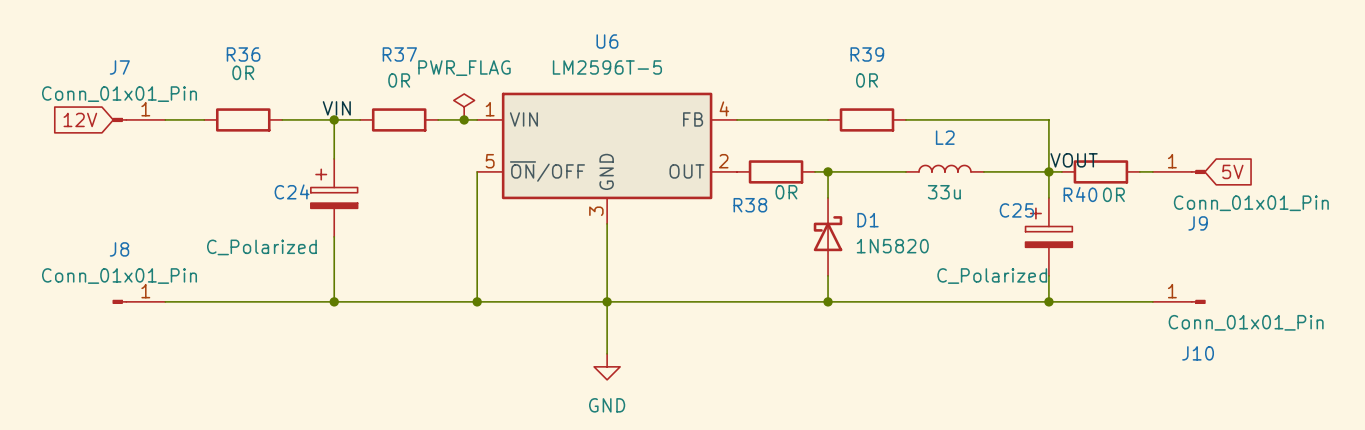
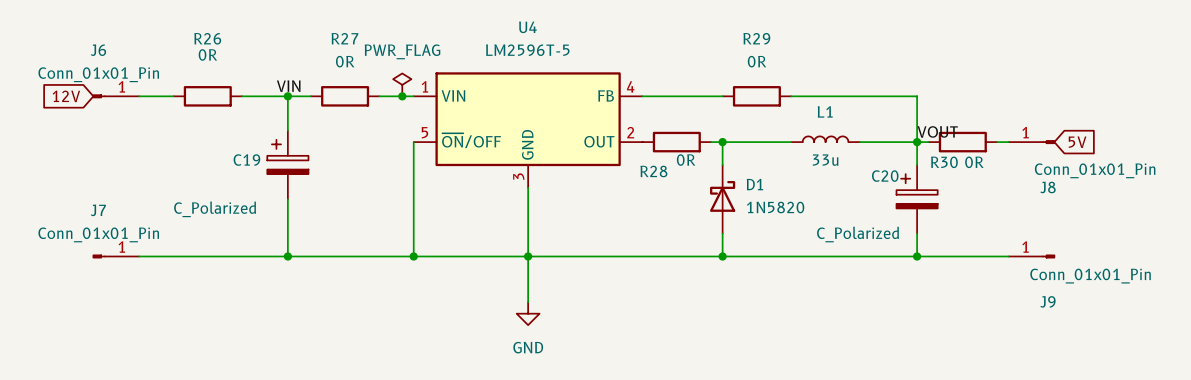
U6 name: U6 (607, 41) -> U4 (527, 27)
R36 name: R36 (243, 54) -> R26 (207, 38)
R37 name: R37 (399, 54) -> R27 (344, 38)
R39 name: R39 (867, 54) -> R29 (756, 38)
J7 name: J7 (119, 67) -> J6 (98, 50)
L2 name: L2 (945, 137) -> L1 (825, 111)
C24 name: C24 (292, 191) -> C19 (246, 160)
R40 name: R40 (1080, 194) -> R30 (944, 162)
R38 name: R38 (750, 205) -> R28 (653, 171)
C25 name: C25 (1016, 210) -> C20 (885, 176)
J9 name: J9 (1198, 223) -> J8 (1048, 187)
J8 name: J8 (119, 249) -> J7 (98, 210)
J10 name: J10 (1198, 353) -> J9 (1047, 301)

